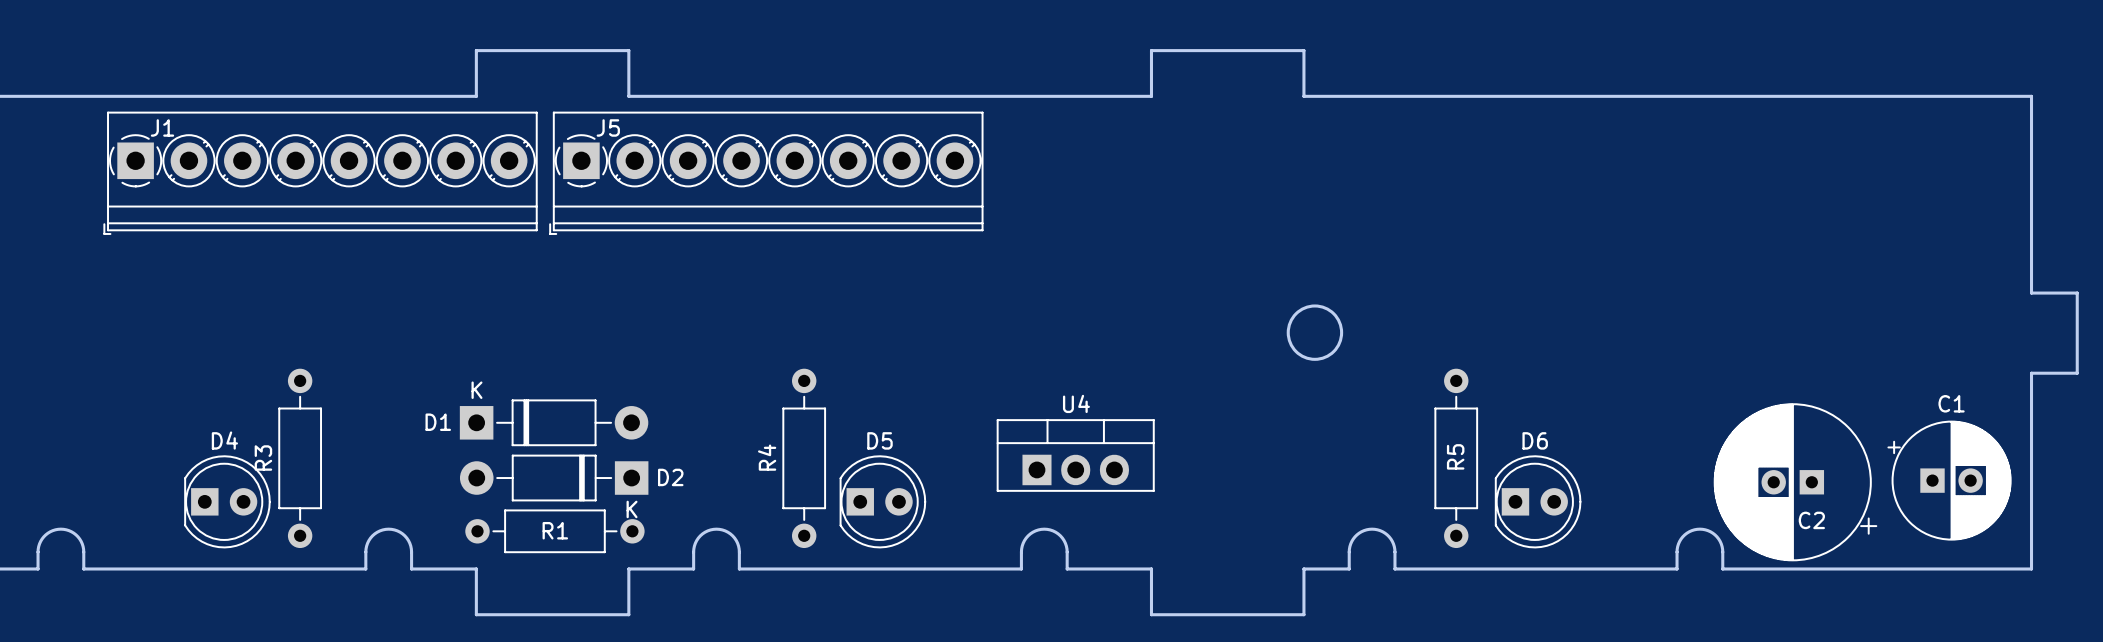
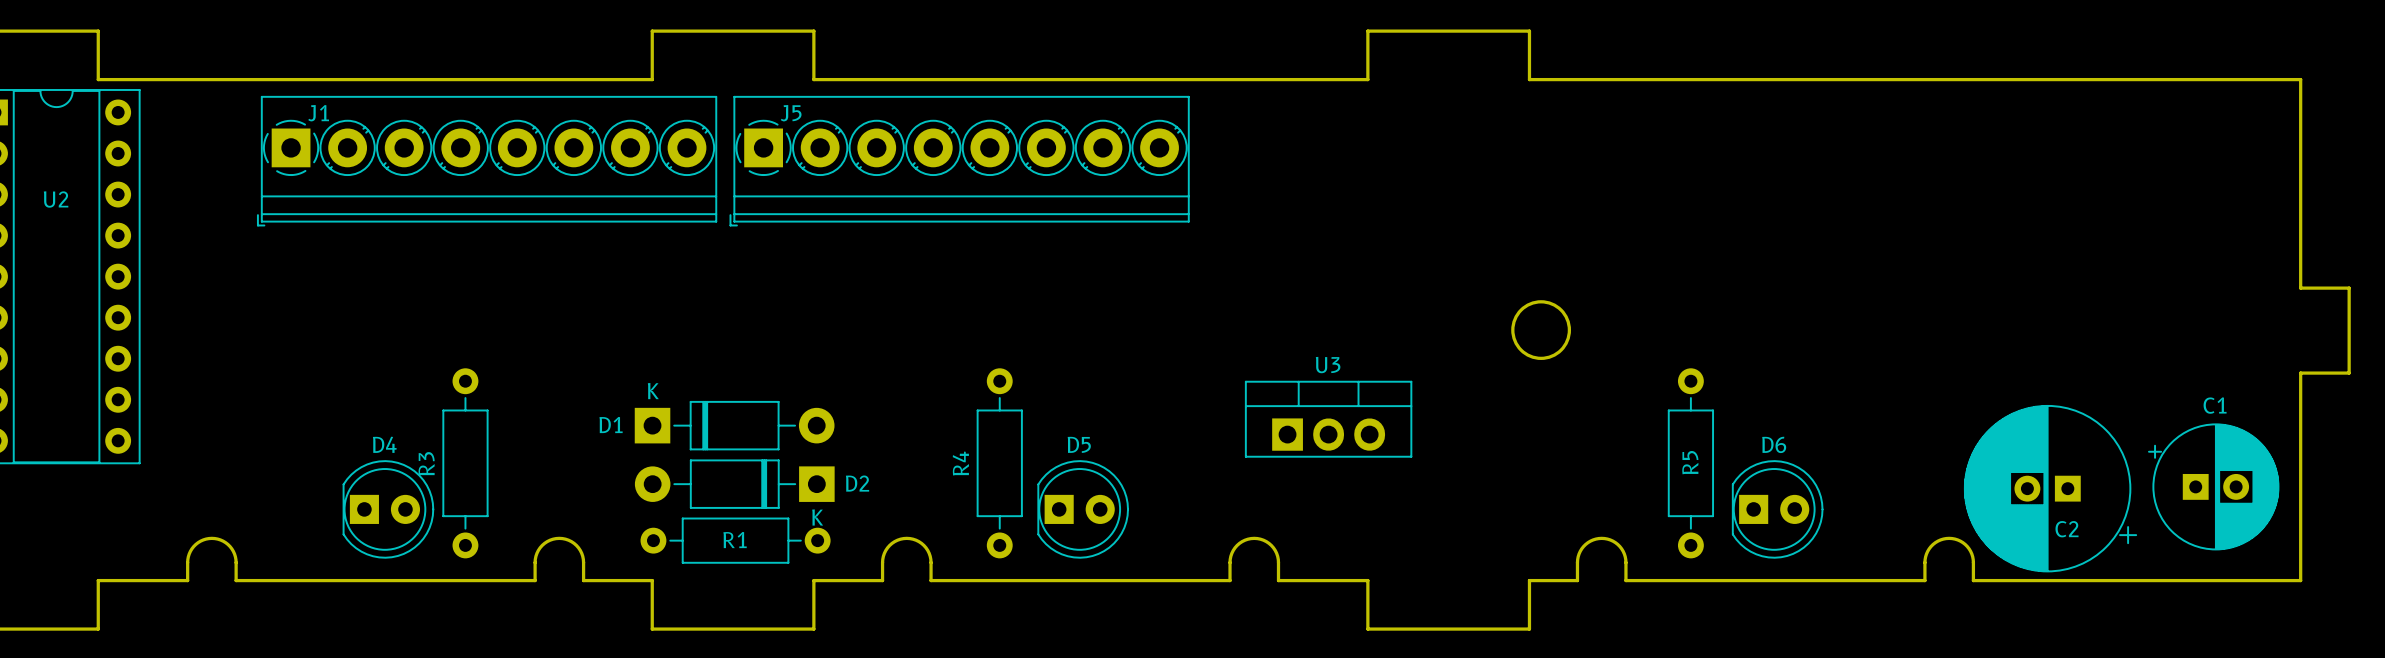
U3: none -> (1328, 419)
U4: (1075, 455) -> none

